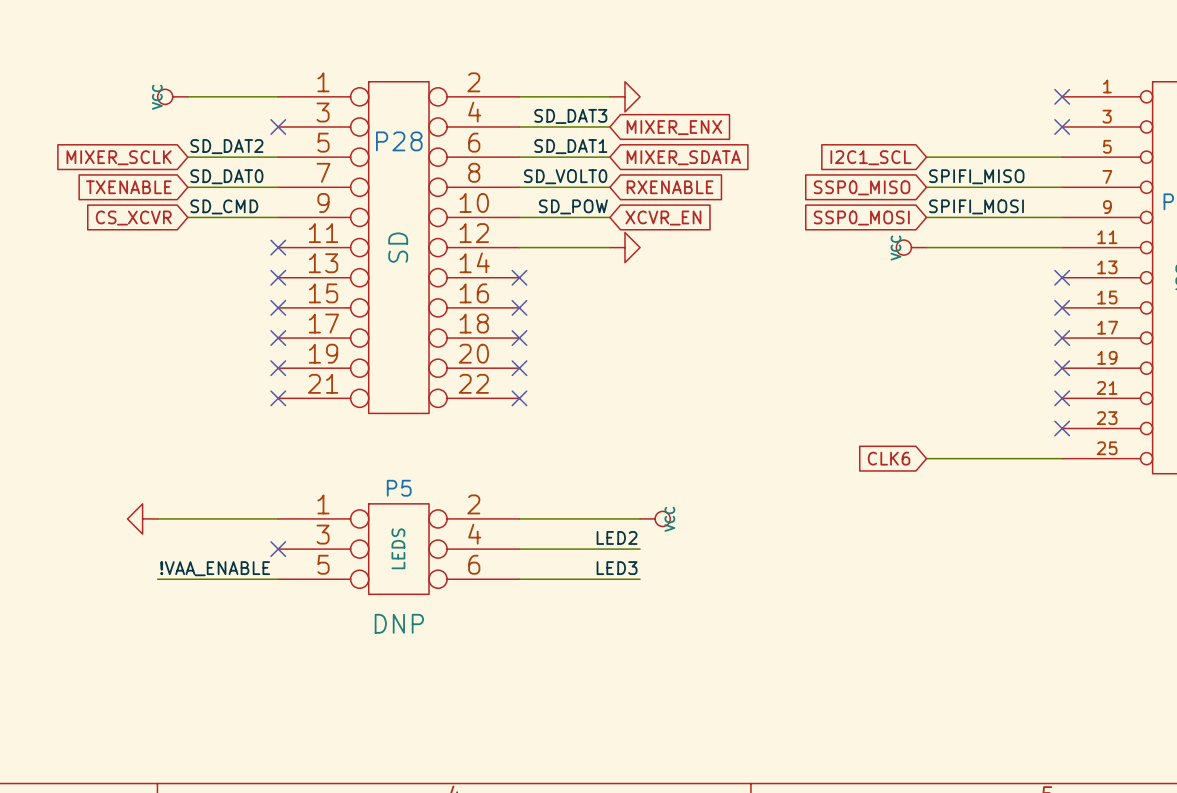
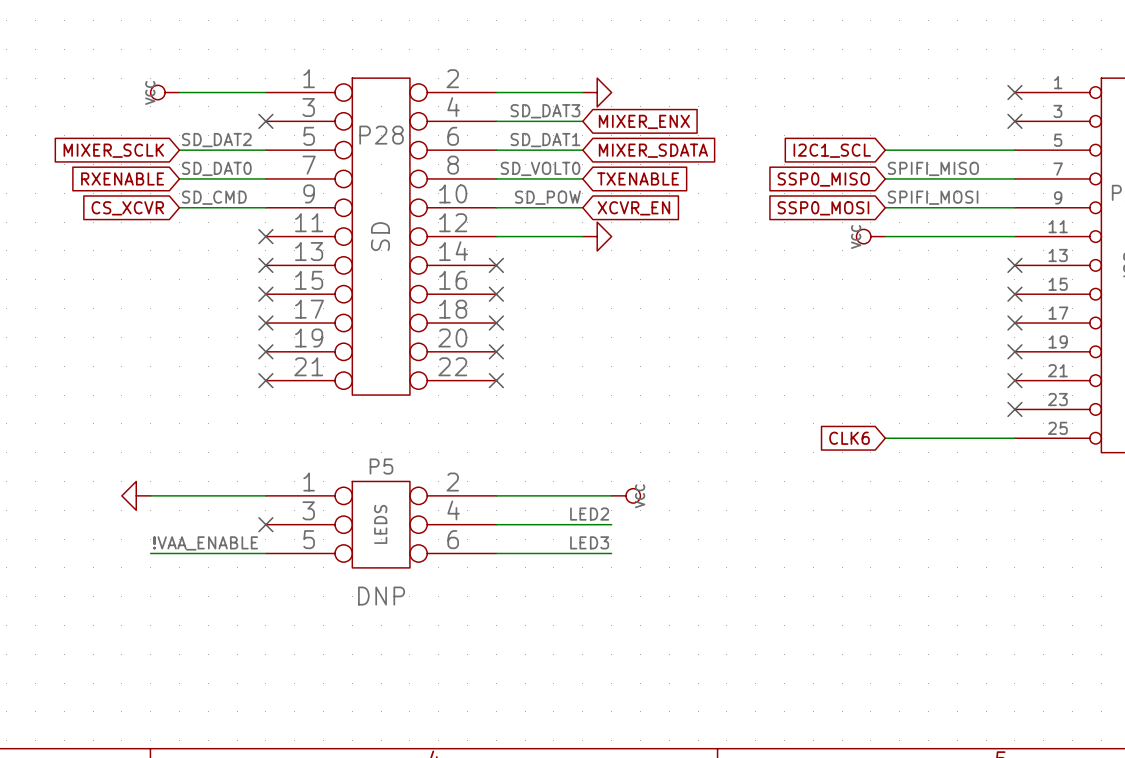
global label: TXENABLE (128, 187) -> RXENABLE (122, 178)
global label: RXENABLE (670, 187) -> TXENABLE (638, 178)

